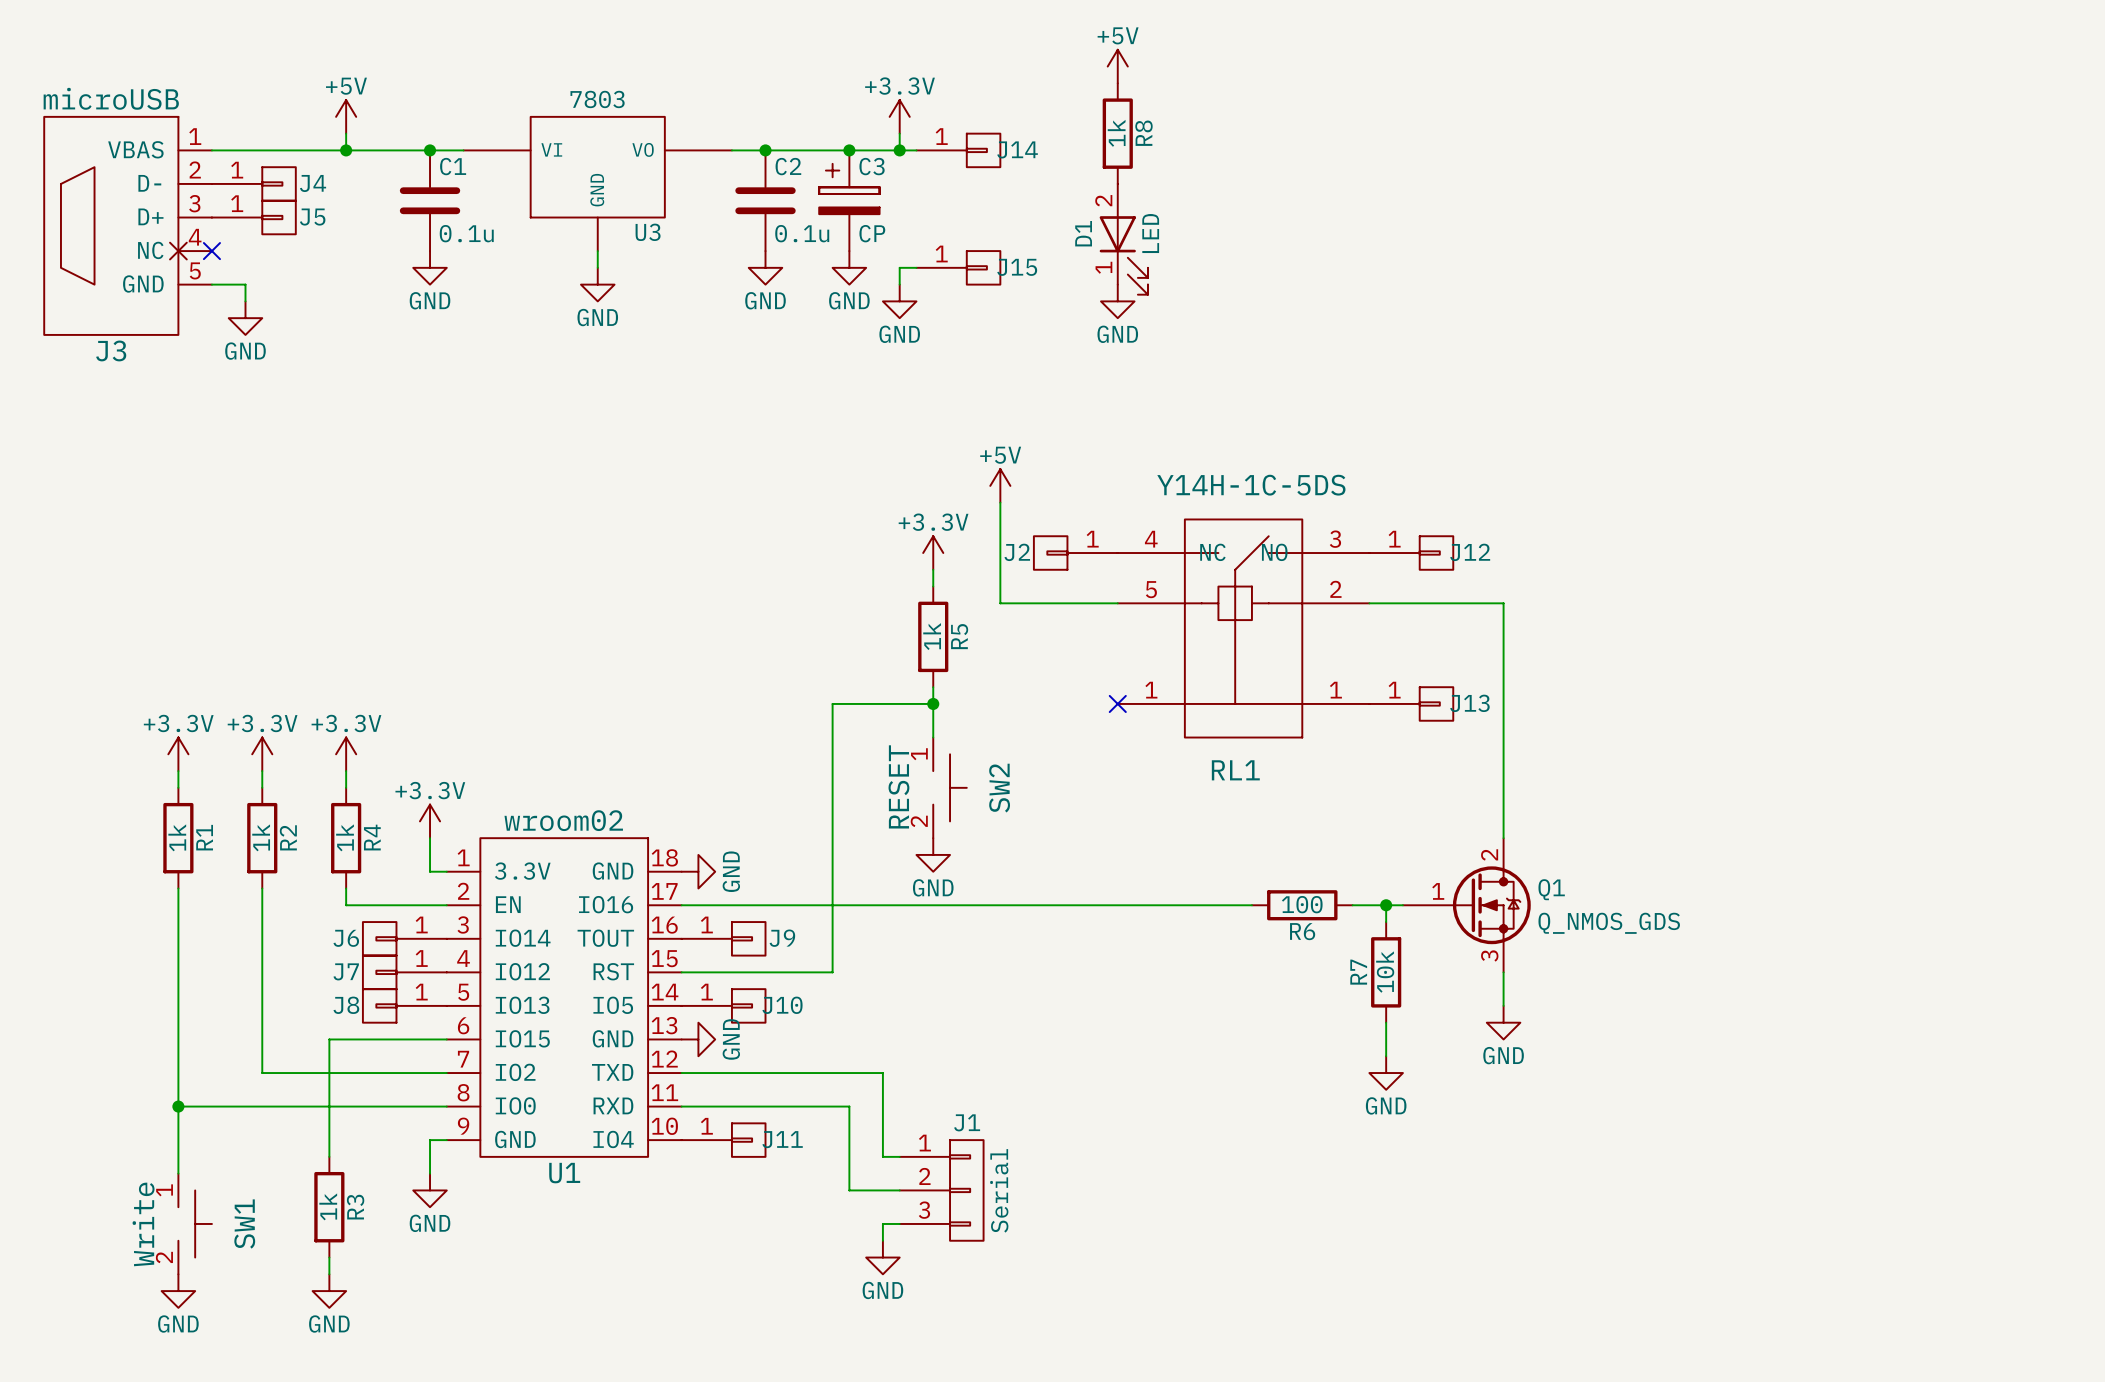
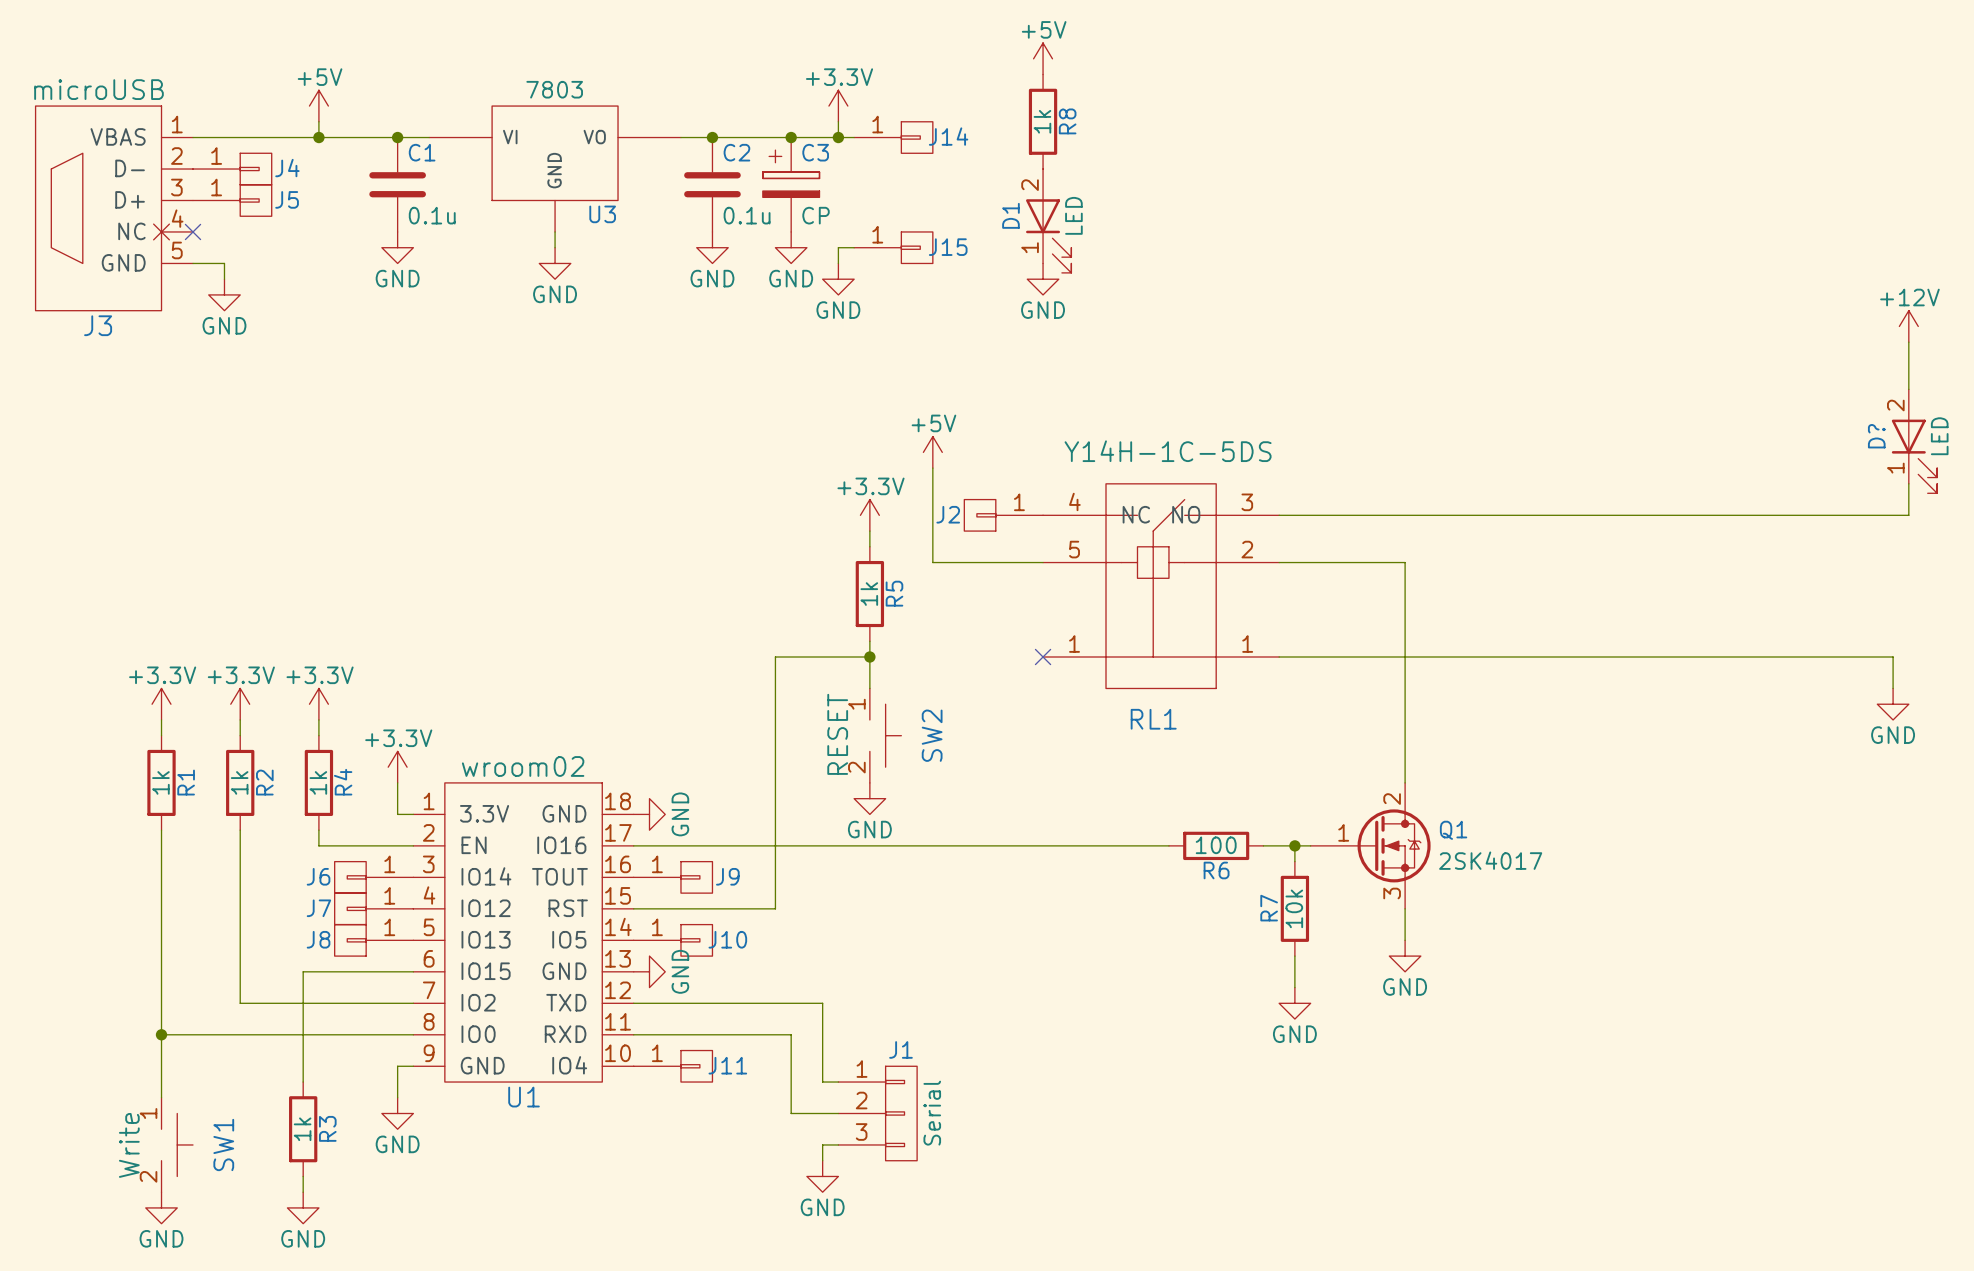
power symbol: none -> +12V (1908, 326)
wire: none -> (1908, 342) (1908, 389)
D?: none -> LED (1914, 441)
wire: none -> (1908, 483) (1908, 515) (1279, 515)
J12: (1411, 553) -> none
wire: none -> (1279, 656) (1893, 656) (1893, 688)
J13: (1411, 703) -> none
power symbol: none -> GND (1893, 704)
Q1 value: Q_NMOS_GDS (1609, 923) -> 2SK4017 (1490, 860)

